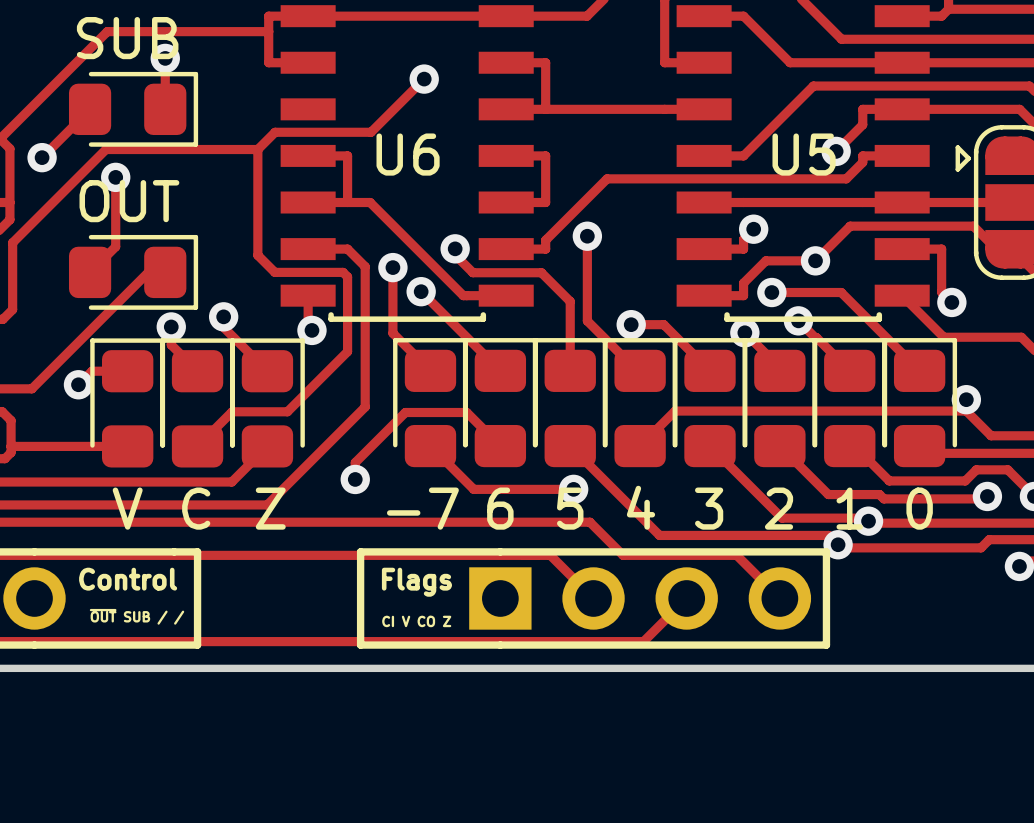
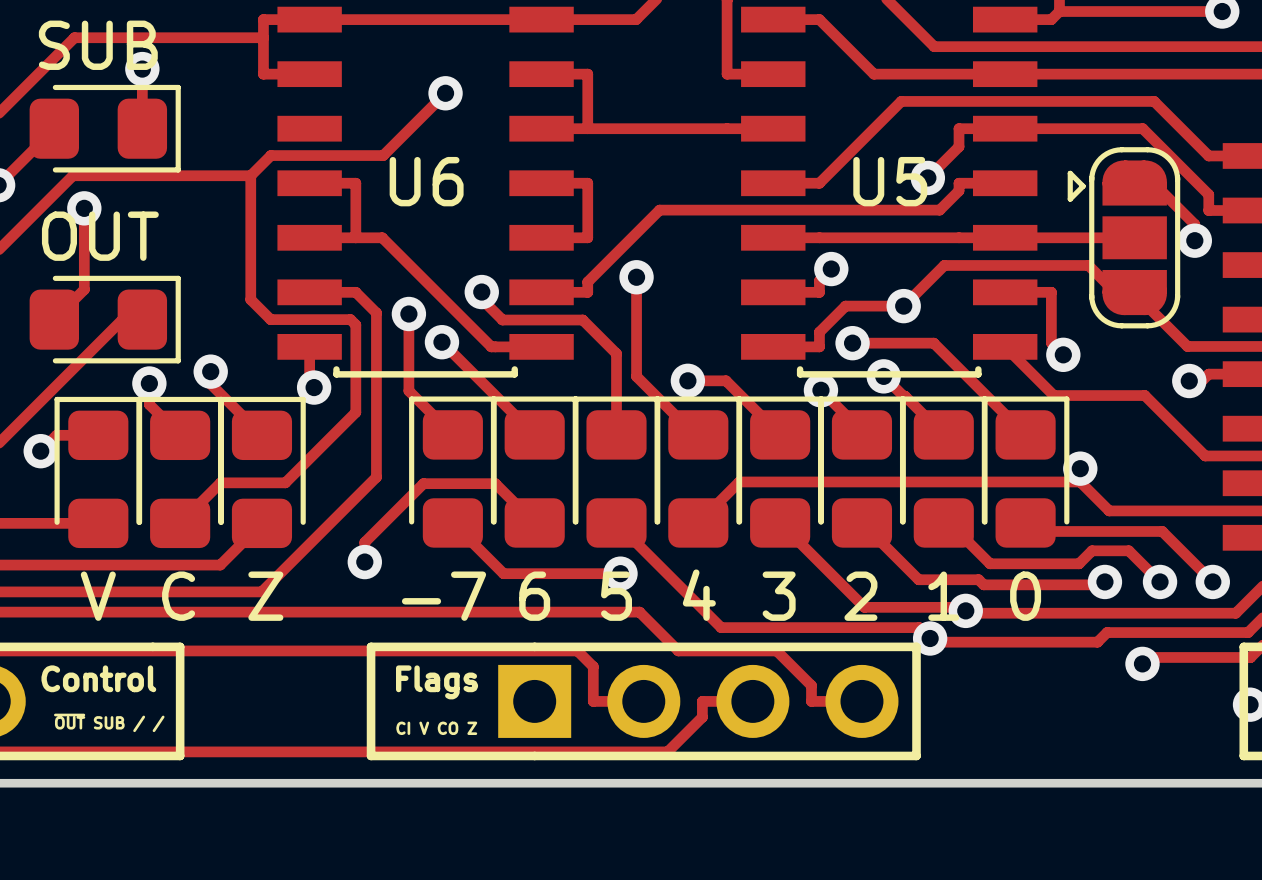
track: (536, 555) (550, 555) (593, 598) -> (577, 650) (593, 666) (593, 701) (643, 701)
track: (707, 555) (736, 555) (779, 598) -> (776, 650) (811, 685) (811, 701) (861, 701)
track: (686, 598) (643, 641) (613, 641) -> (752, 701) (702, 701) (702, 717) (667, 751)

